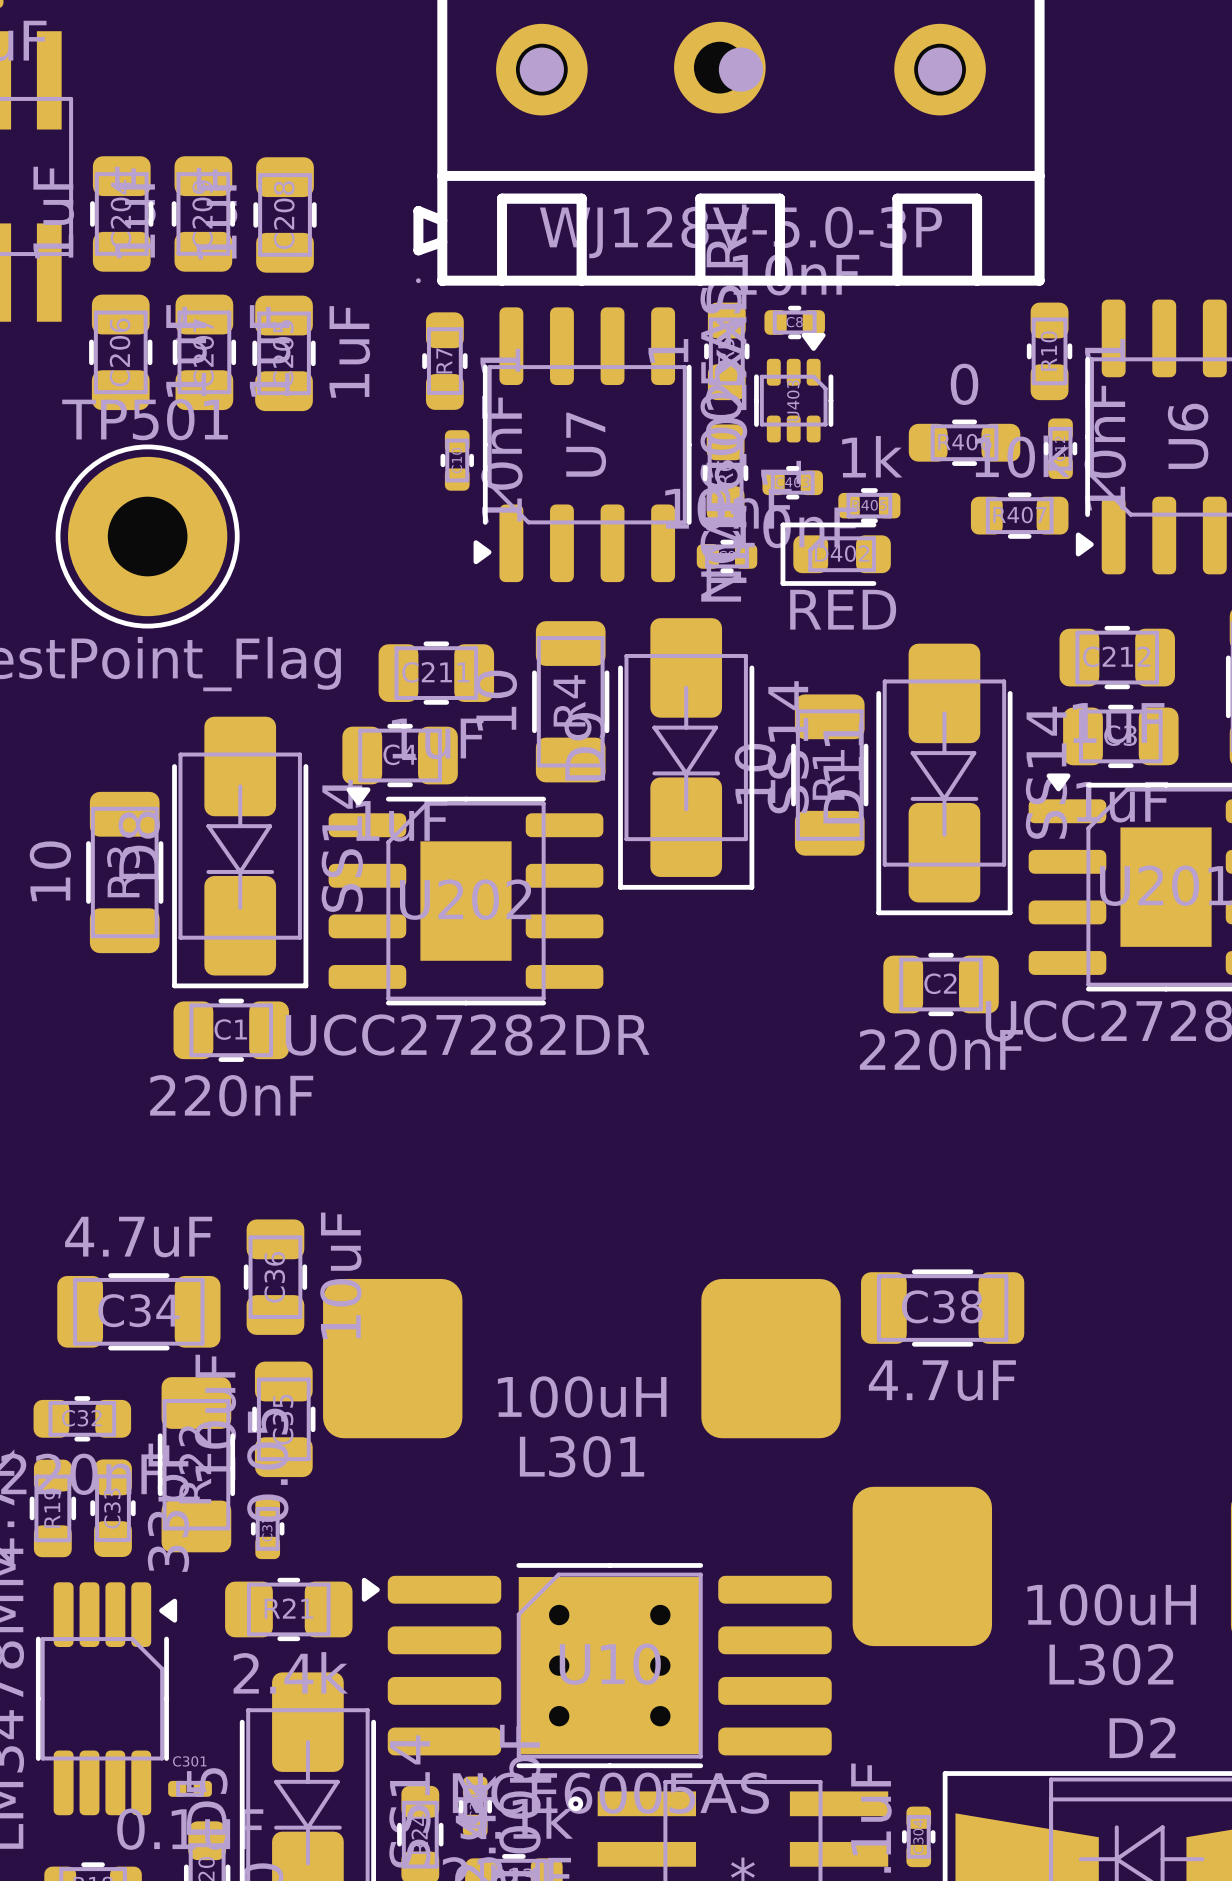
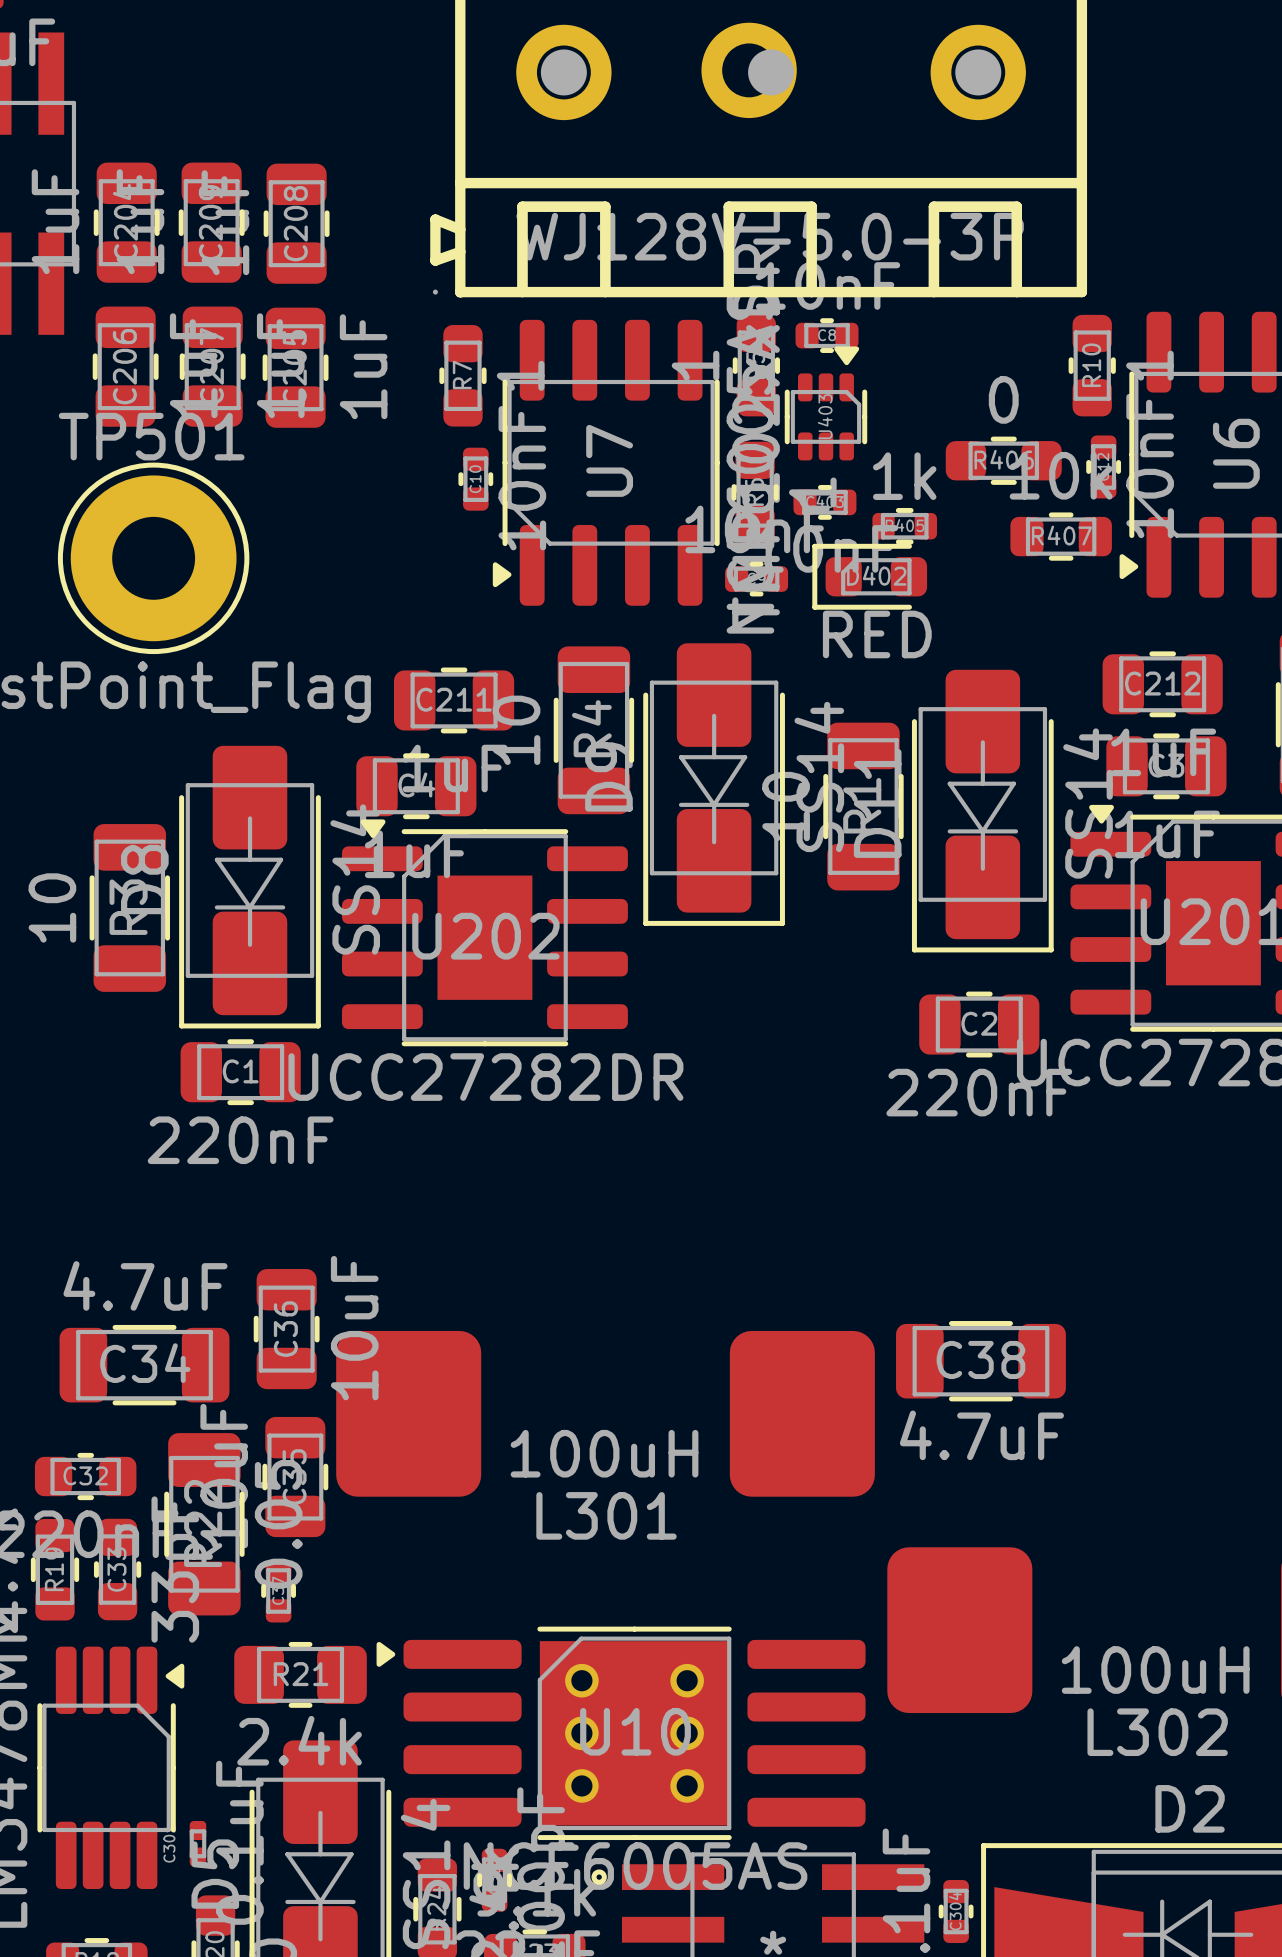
C301 rotation: 0° (190, 1788) -> 90° clockwise (197, 1843)

